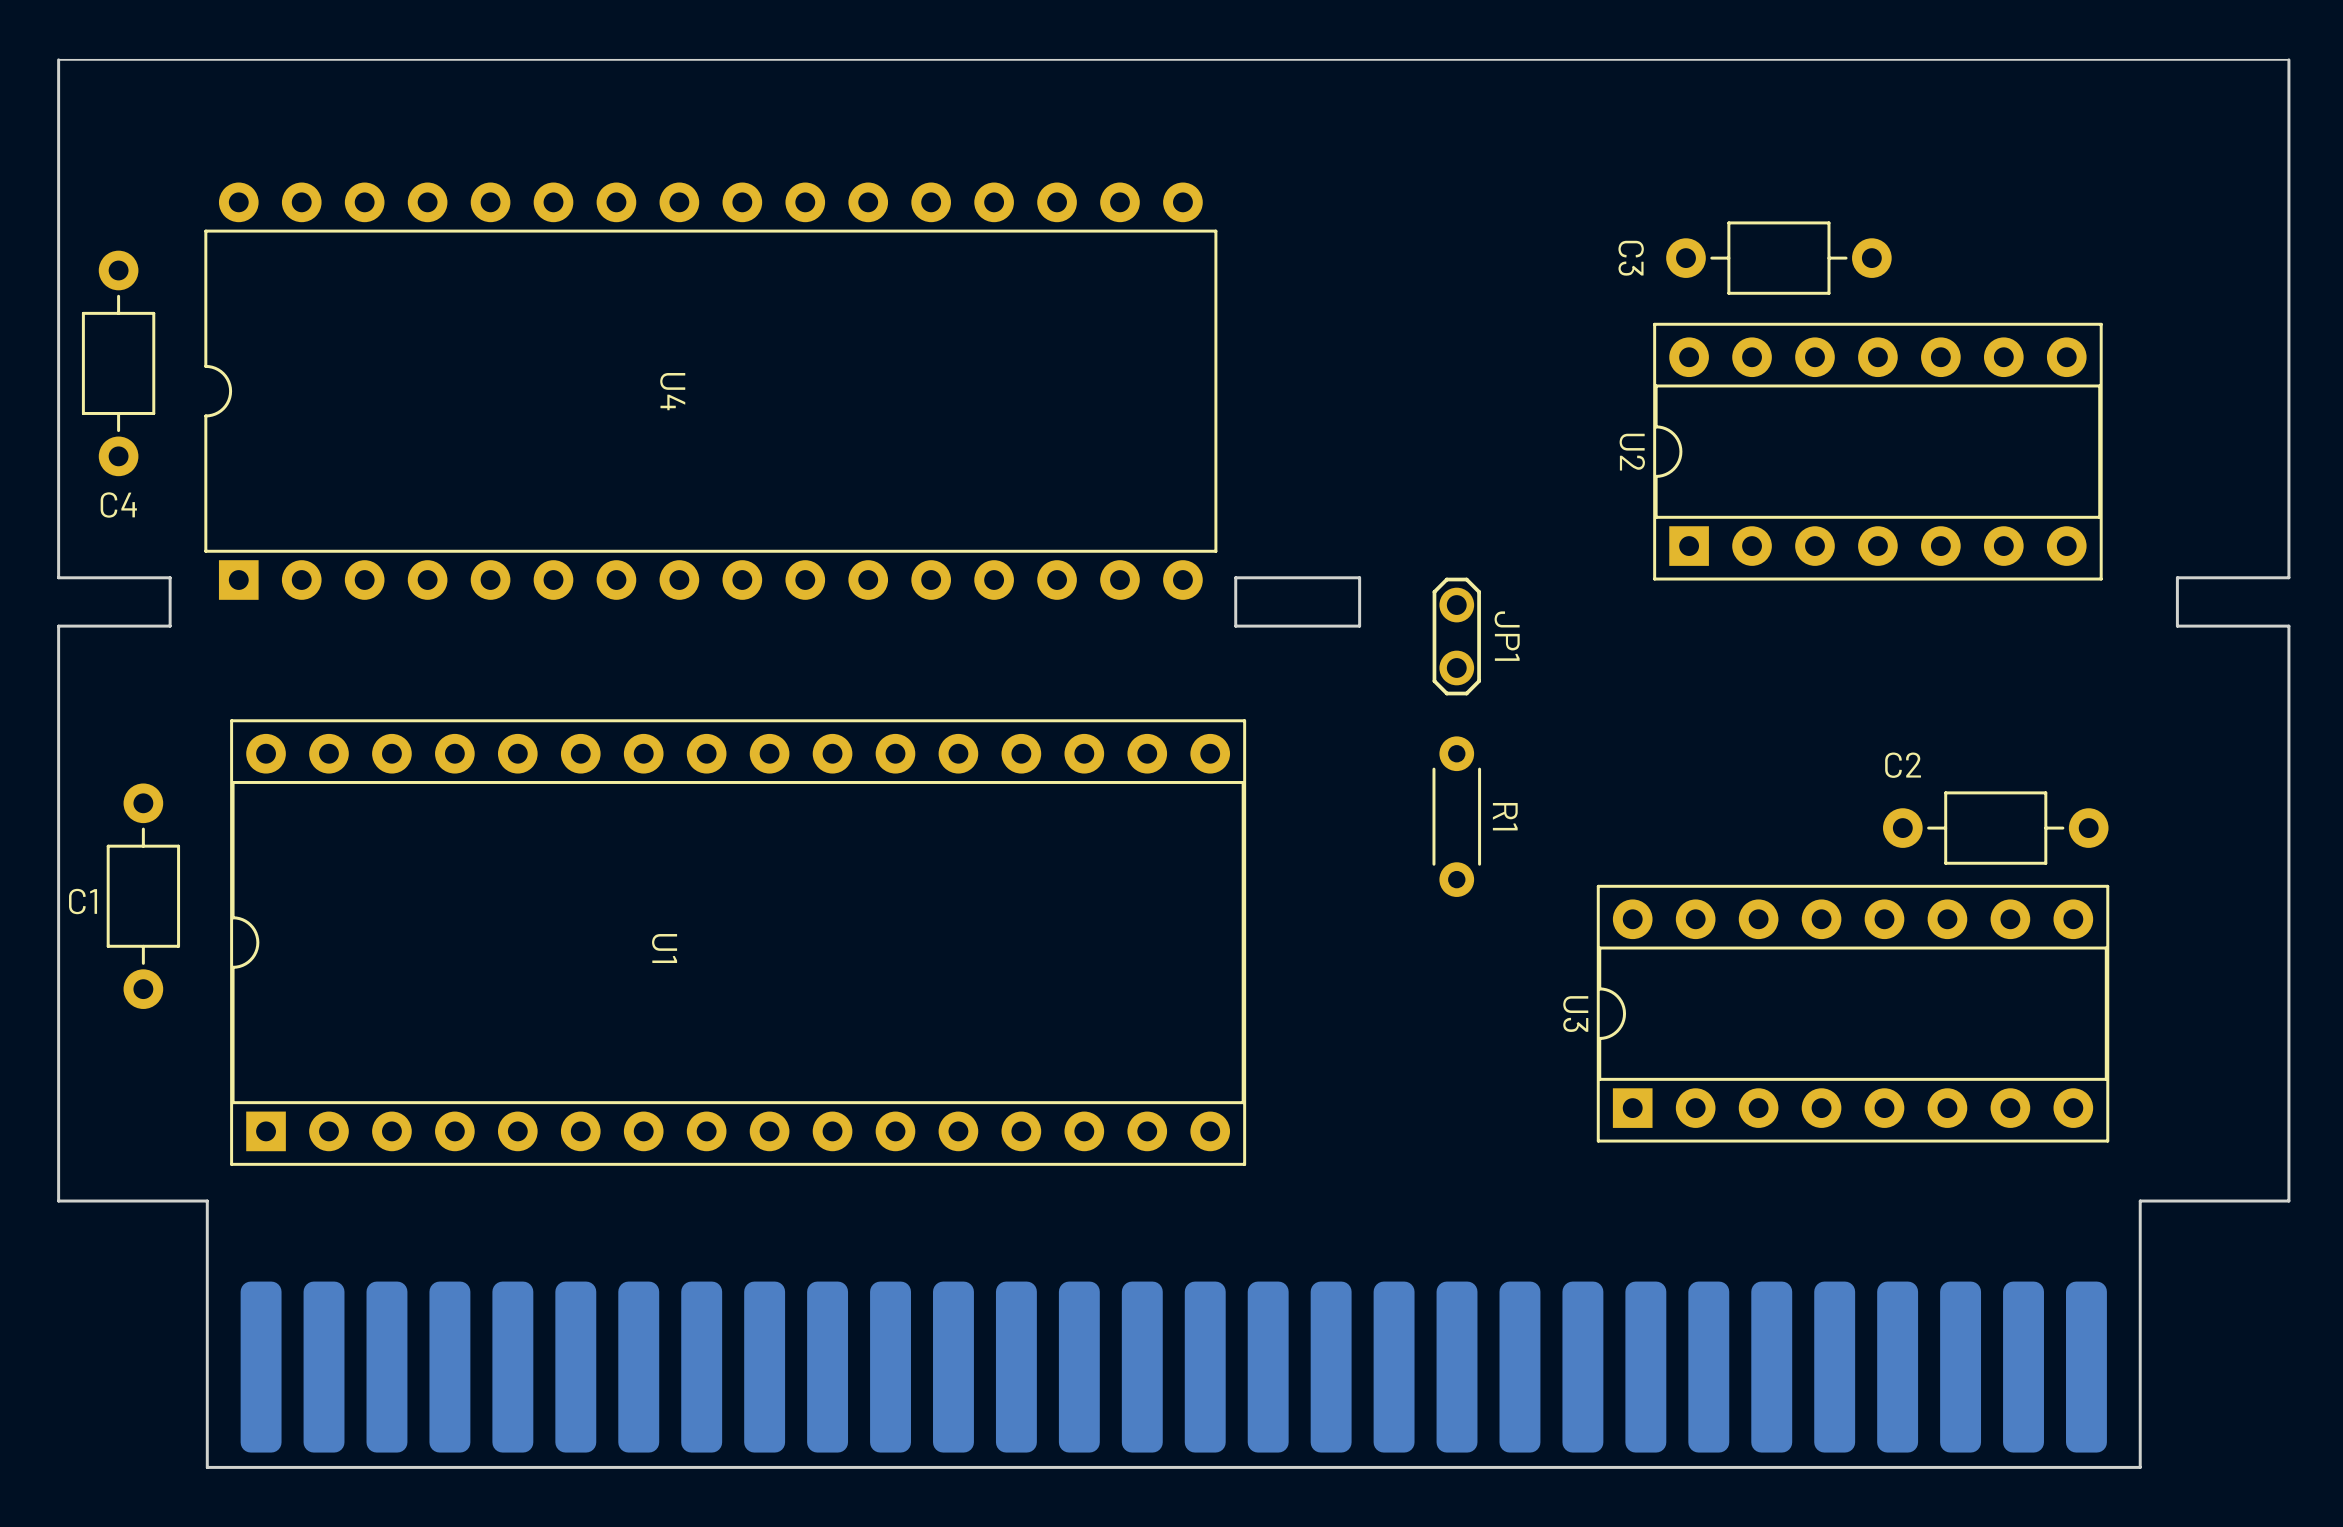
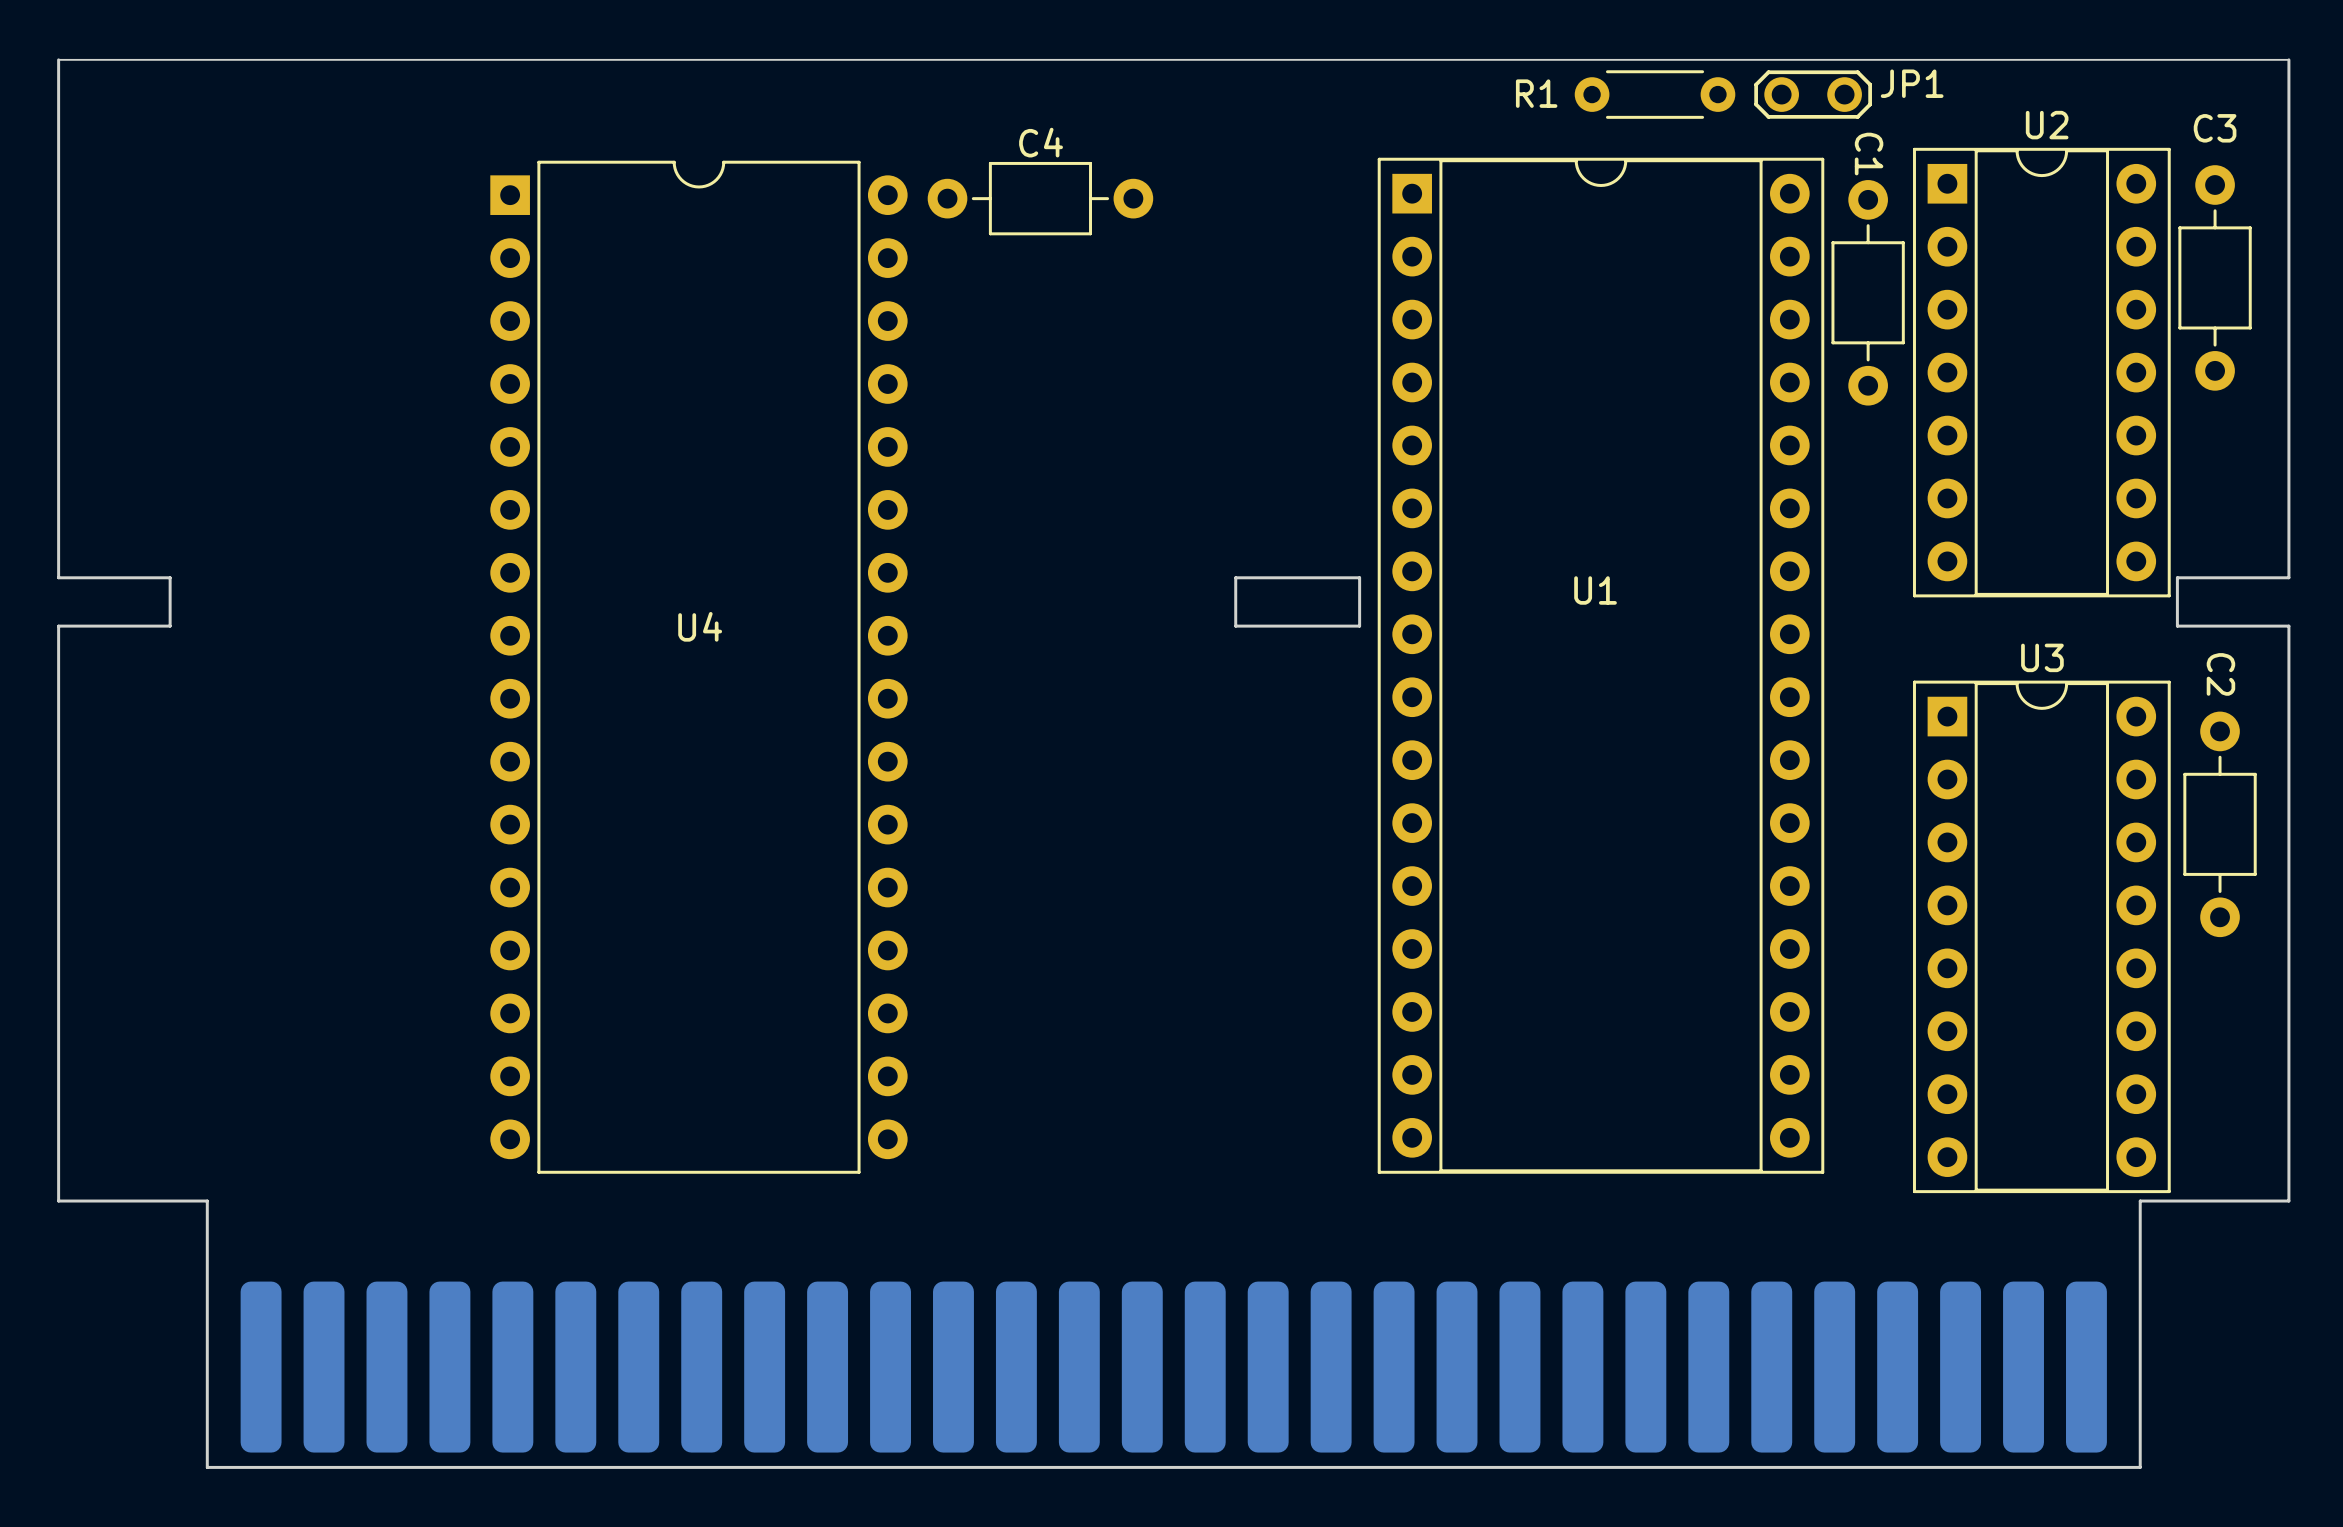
C3 rotation: 0° (1778, 258) -> 90° clockwise (2215, 277)
C3 position: (1778, 258) -> (2215, 277)
C4 rotation: 0° (118, 363) -> 90° clockwise (1040, 198)
C4 position: (118, 363) -> (1040, 198)
U4 rotation: 0° (710, 391) -> 90° clockwise (698, 667)
U2 rotation: 0° (1877, 451) -> 90° clockwise (2041, 372)
C4 name position: C4 (118, 505) -> C4 (1041, 142)
JP1 rotation: 0° (1456, 636) -> 90° clockwise (1813, 94)
JP1 position: (1456, 636) -> (1813, 94)
JP1 name position: JP1 (1507, 636) -> JP1 (1912, 83)
C2 name position: C2 (1903, 765) -> C2 (2220, 674)
R1 rotation: 0° (1456, 816) -> 90° clockwise (1655, 94)
R1 position: (1456, 816) -> (1655, 94)
R1 name position: R1 (1505, 816) -> R1 (1536, 93)
C2 rotation: 0° (1995, 828) -> 90° clockwise (2220, 824)
C2 position: (1995, 828) -> (2220, 824)
C1 position: (143, 896) -> (1868, 292)
C1 name rotation: 0° (83, 901) -> 90° clockwise (1869, 154)
C1 name position: C1 (83, 901) -> C1 (1869, 154)
U1 rotation: 0° (738, 942) -> 90° clockwise (1601, 665)
U1 position: (738, 942) -> (1601, 665)
U3 rotation: 0° (1853, 1013) -> 90° clockwise (2041, 936)

